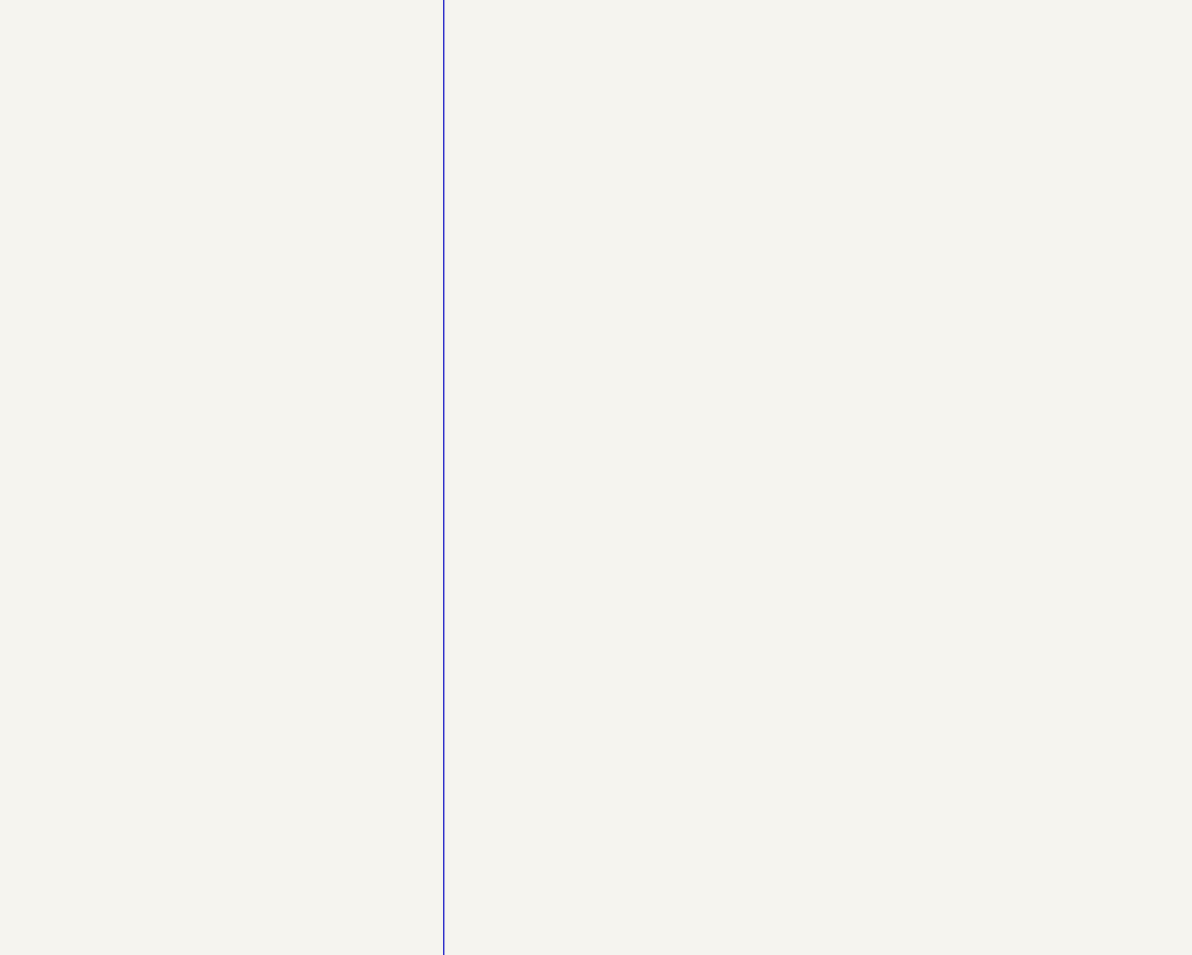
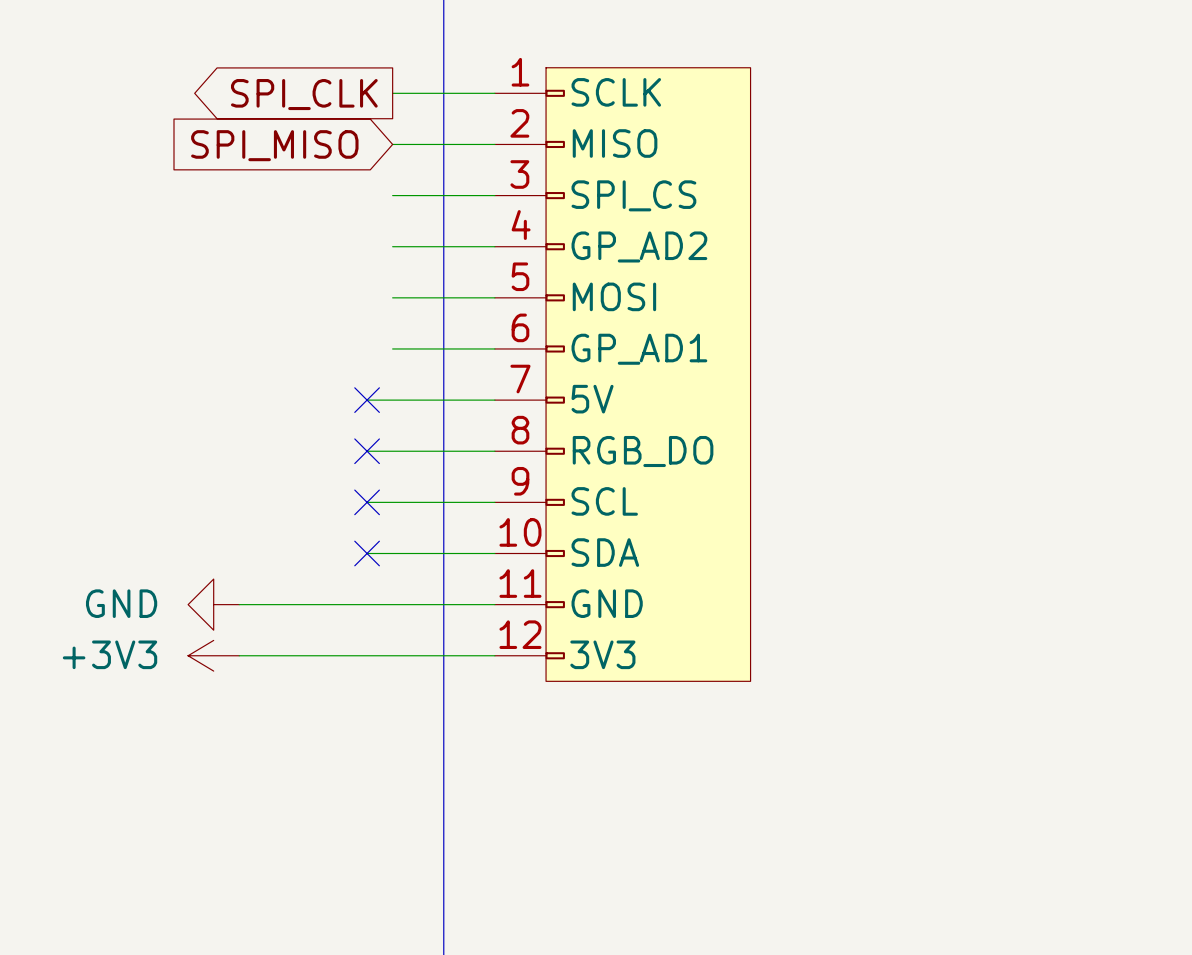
wire: none -> (392, 93) (494, 93)
global label: none -> SPI_CLK (304, 94)
wire: none -> (392, 144) (494, 144)
global label: none -> SPI_MISO (274, 145)
wire: none -> (392, 195) (494, 195)
wire: none -> (392, 246) (494, 246)
wire: none -> (392, 297) (494, 297)
wire: none -> (392, 348) (494, 348)
part: none -> (622, 374)
wire: none -> (367, 400) (494, 400)
no-connect mark: none -> (367, 400)
wire: none -> (367, 451) (494, 451)
no-connect mark: none -> (367, 451)
wire: none -> (367, 502) (494, 502)
no-connect mark: none -> (367, 502)
wire: none -> (367, 553) (494, 553)
no-connect mark: none -> (367, 553)
power symbol: none -> GND (213, 604)
wire: none -> (239, 604) (494, 604)
power symbol: none -> +3V3 (213, 655)
wire: none -> (239, 655) (494, 655)

